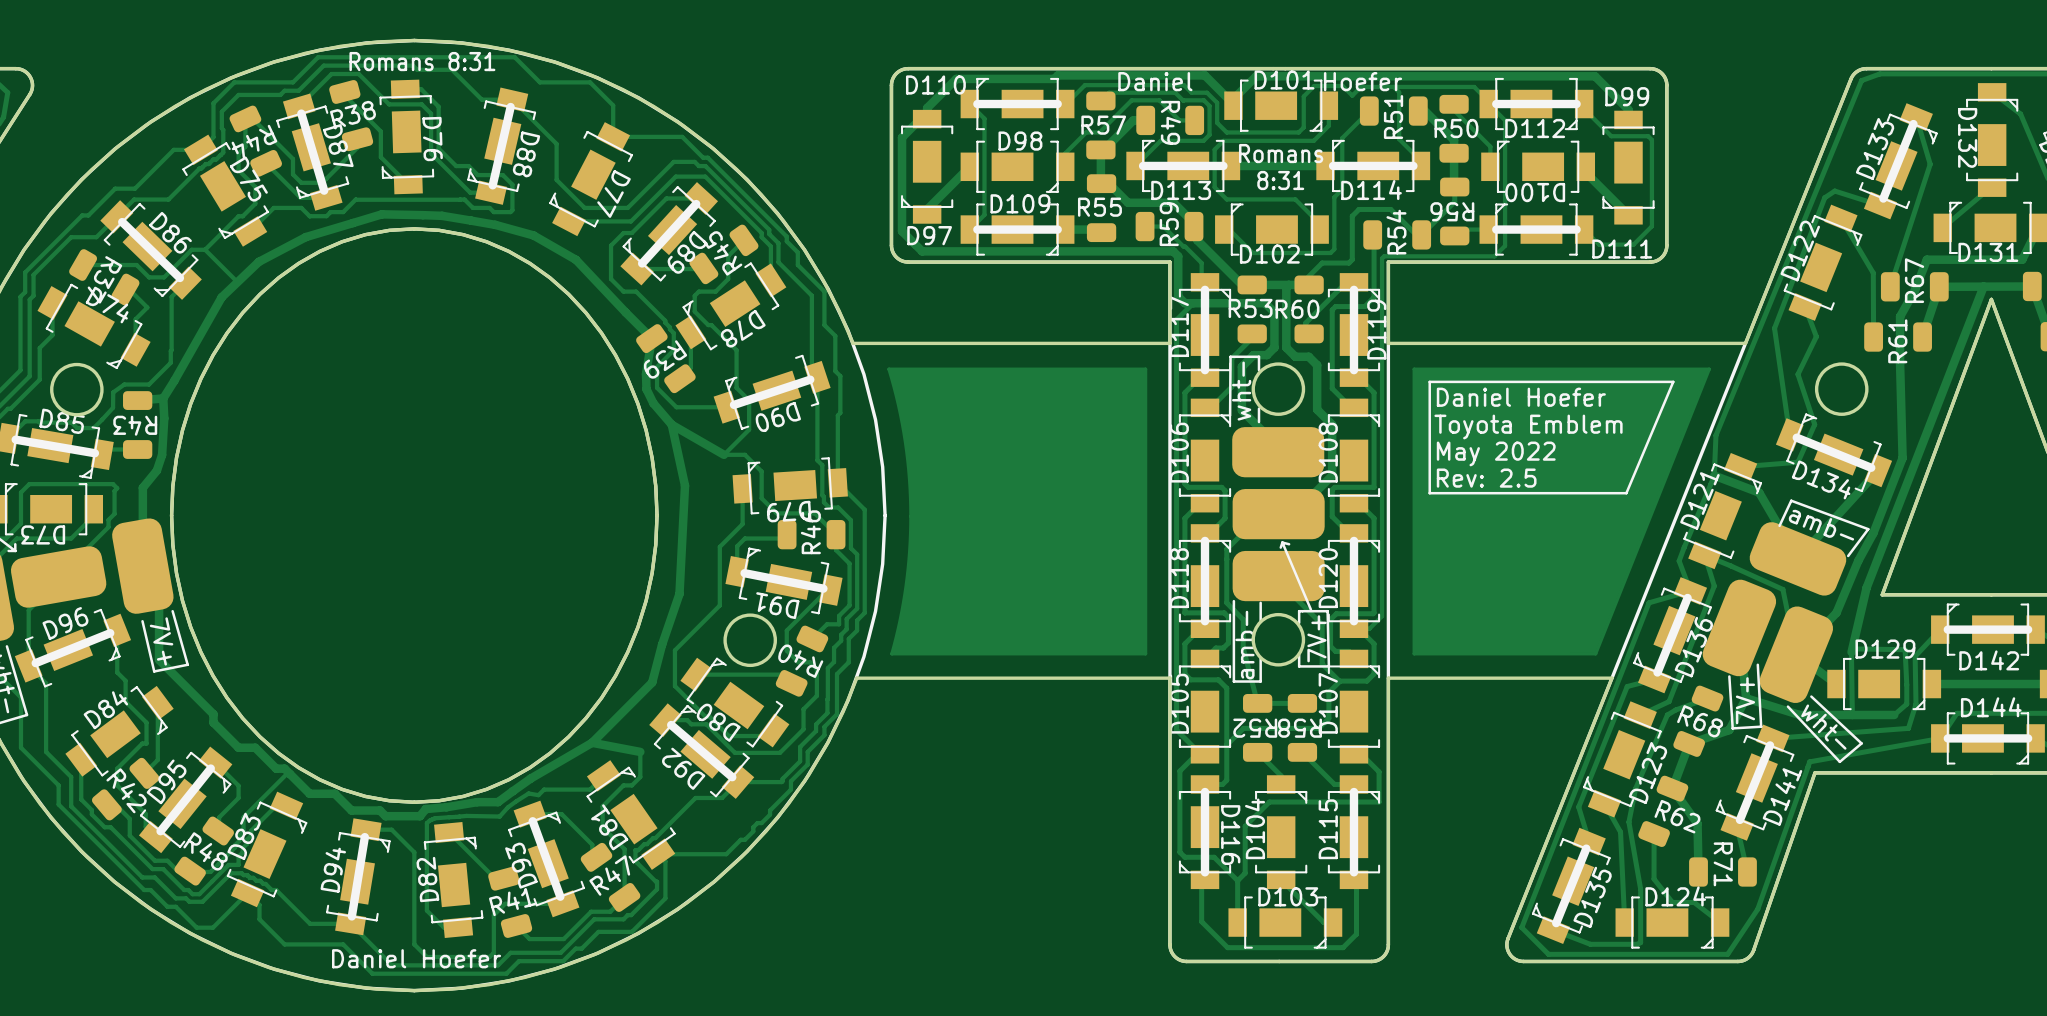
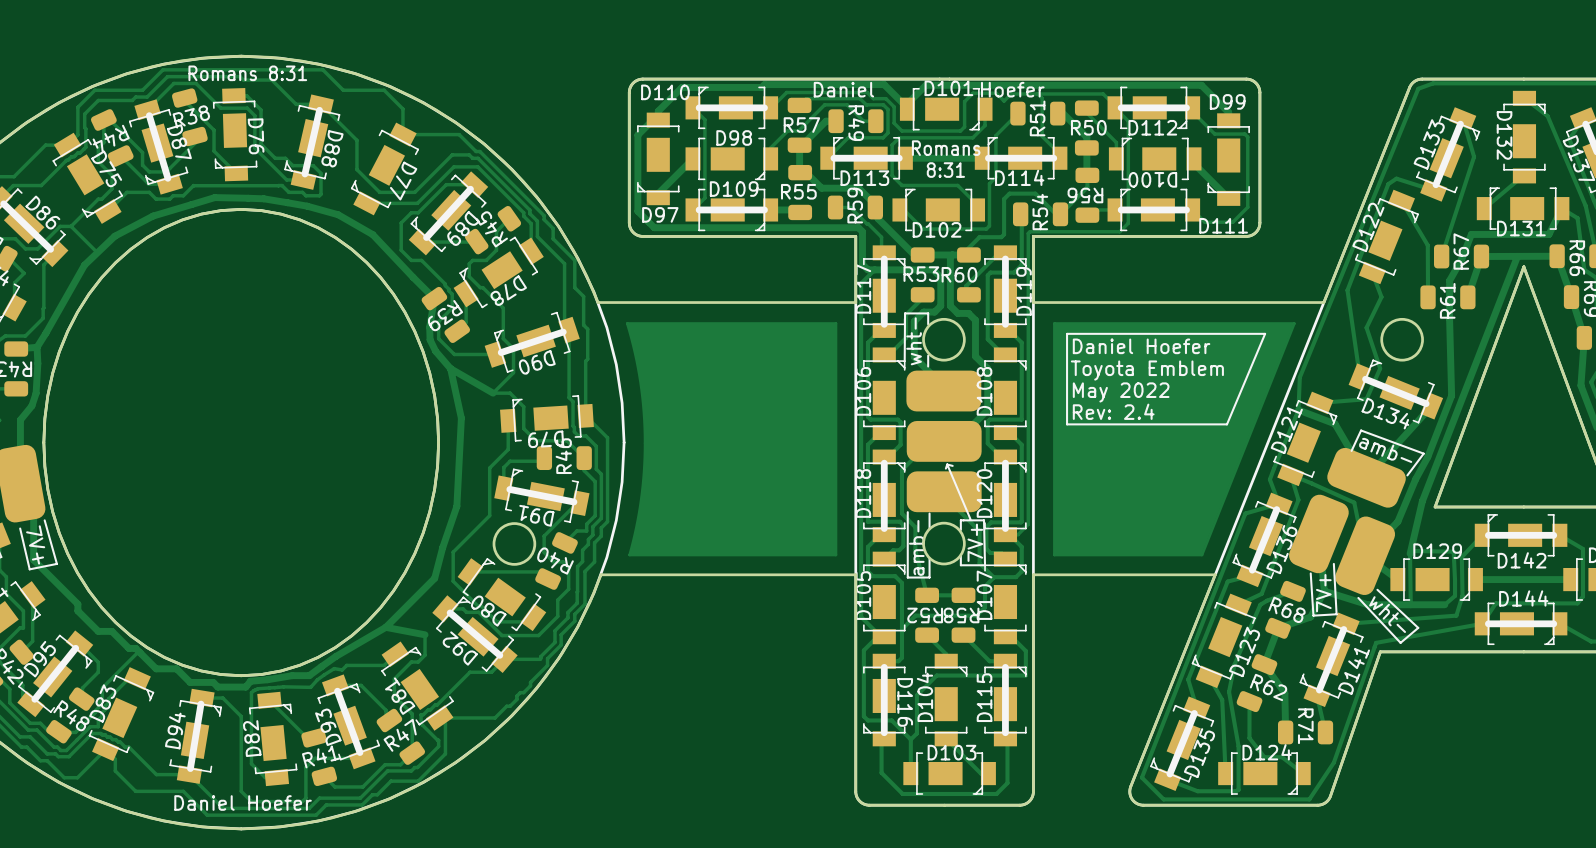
text: Rev: 2.5 (1486, 478) -> Rev: 2.4 (1113, 411)

